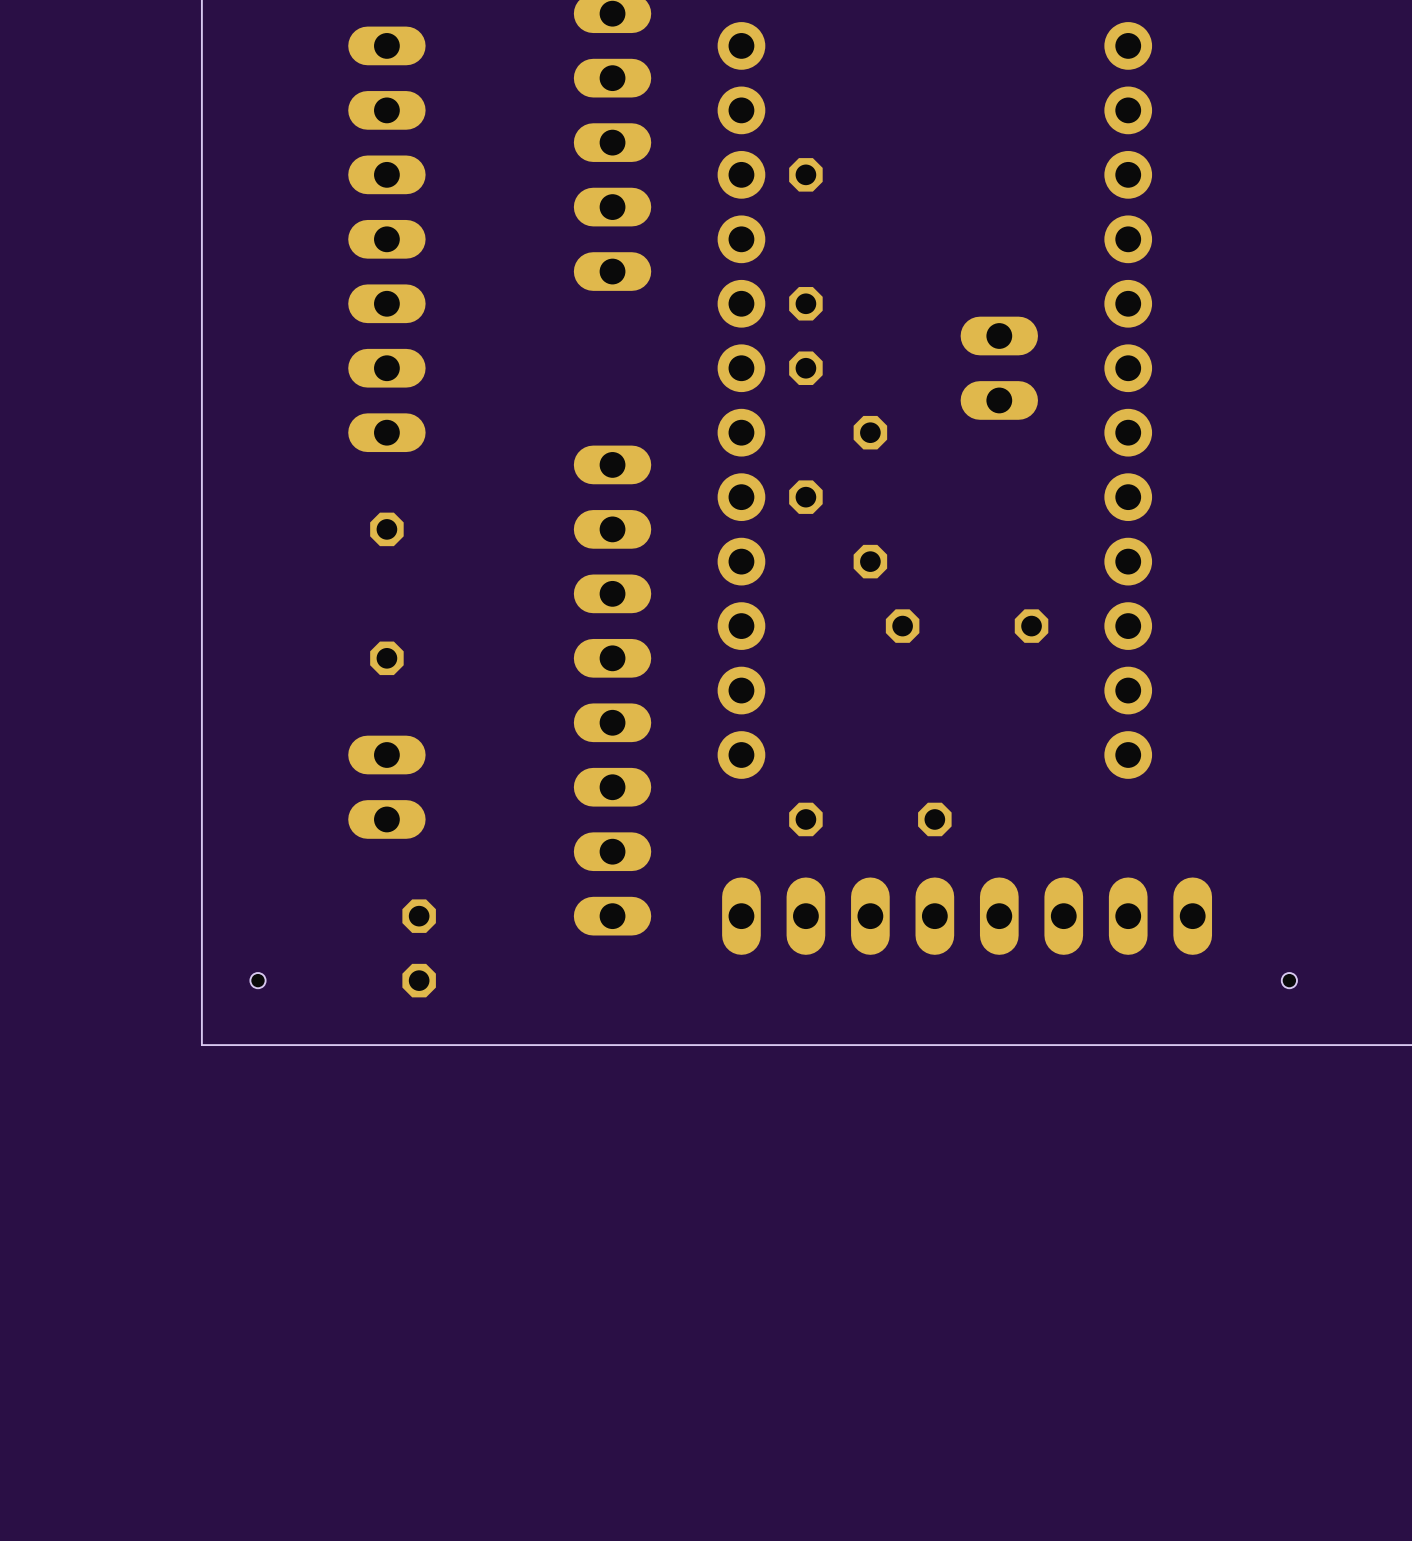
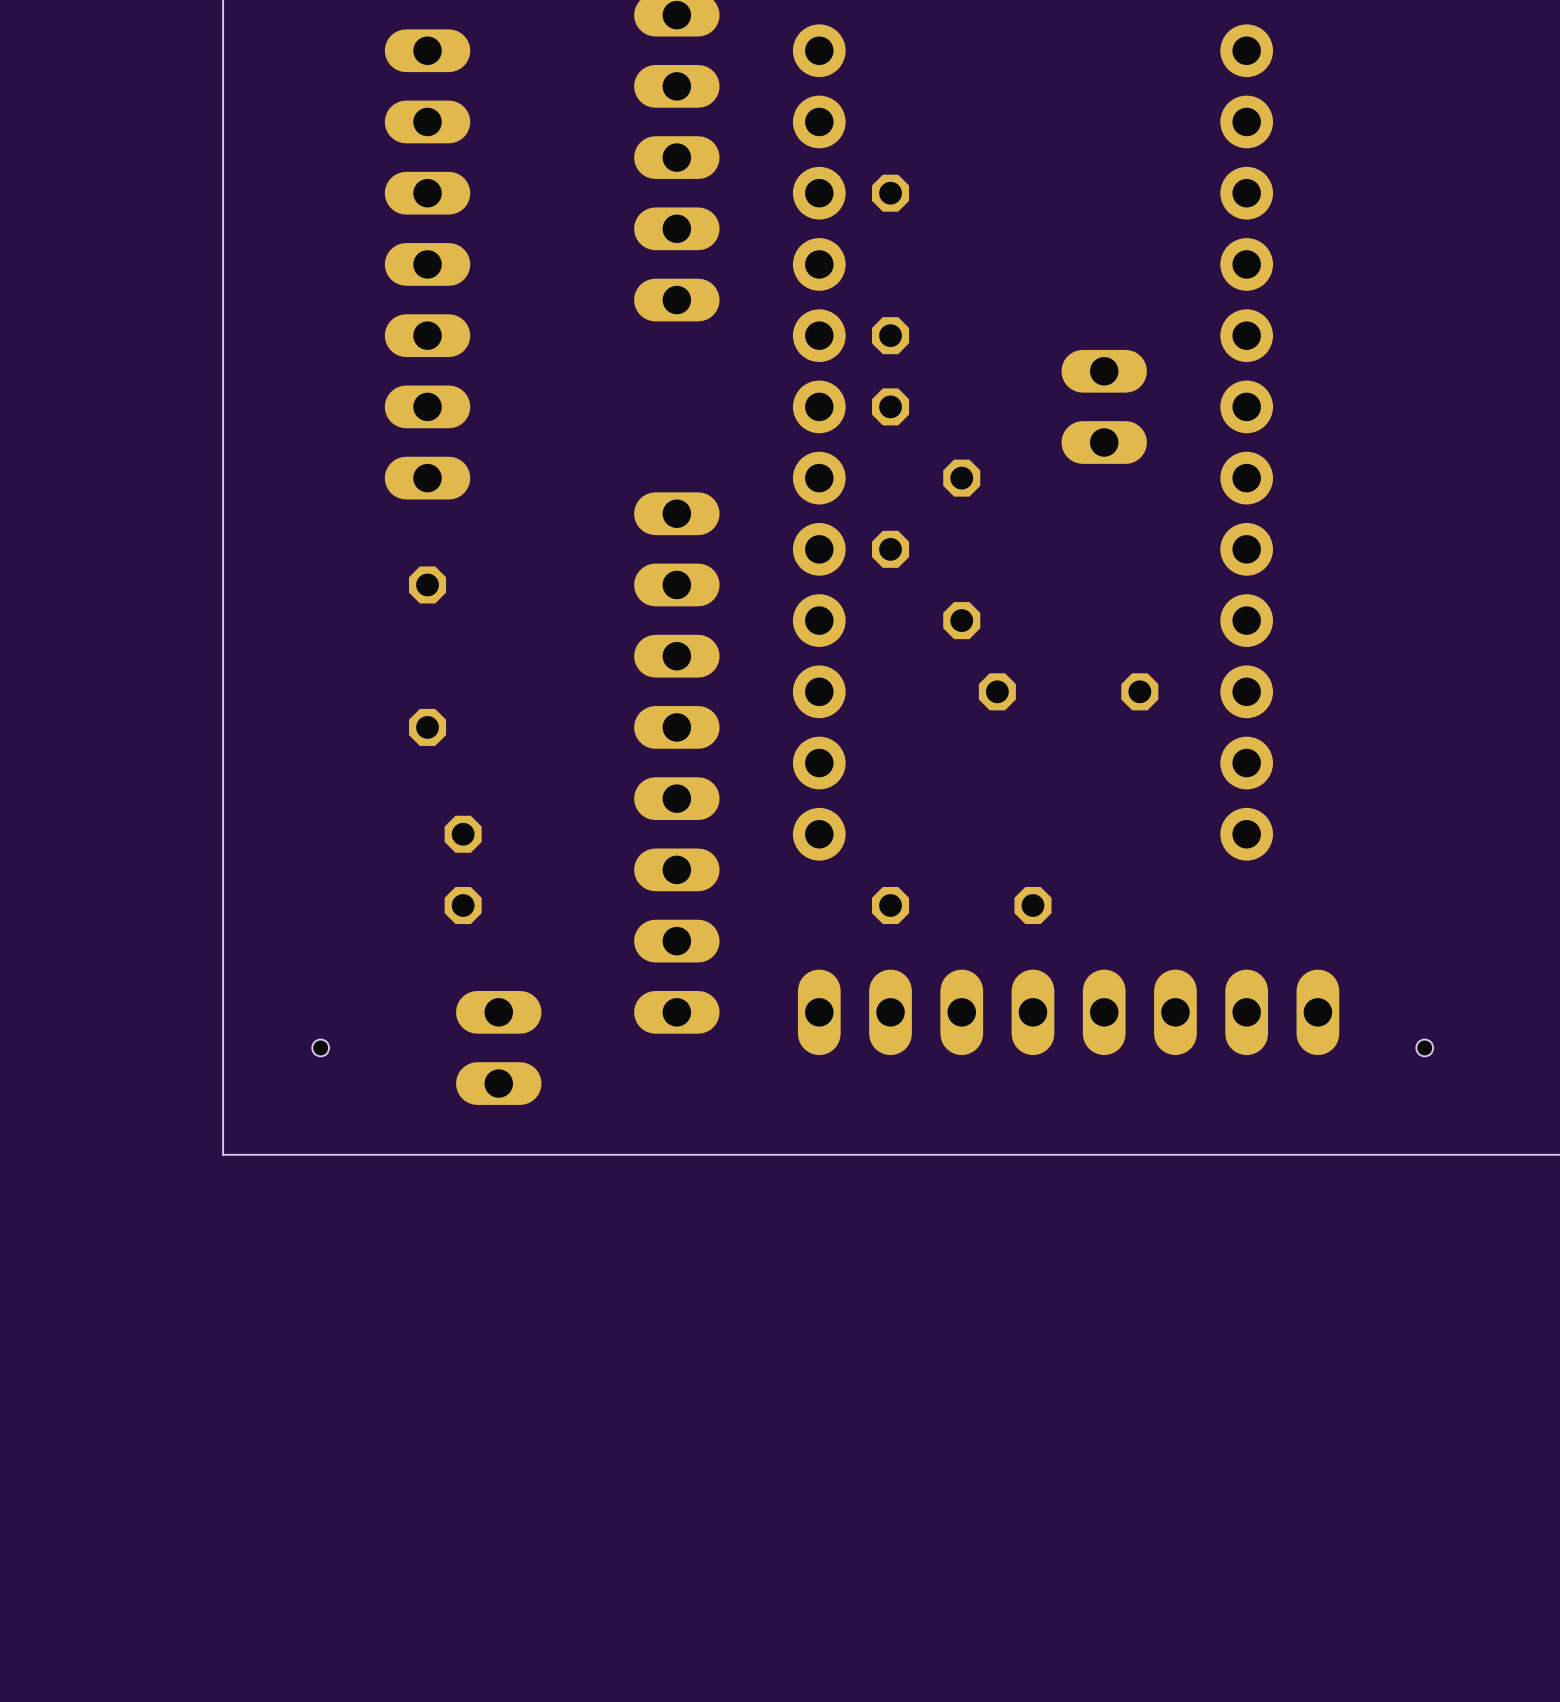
part position: (386, 787) -> (498, 1047)
part position: (419, 948) -> (463, 869)
hole position: (257, 980) -> (320, 1047)
hole position: (1289, 980) -> (1424, 1047)

